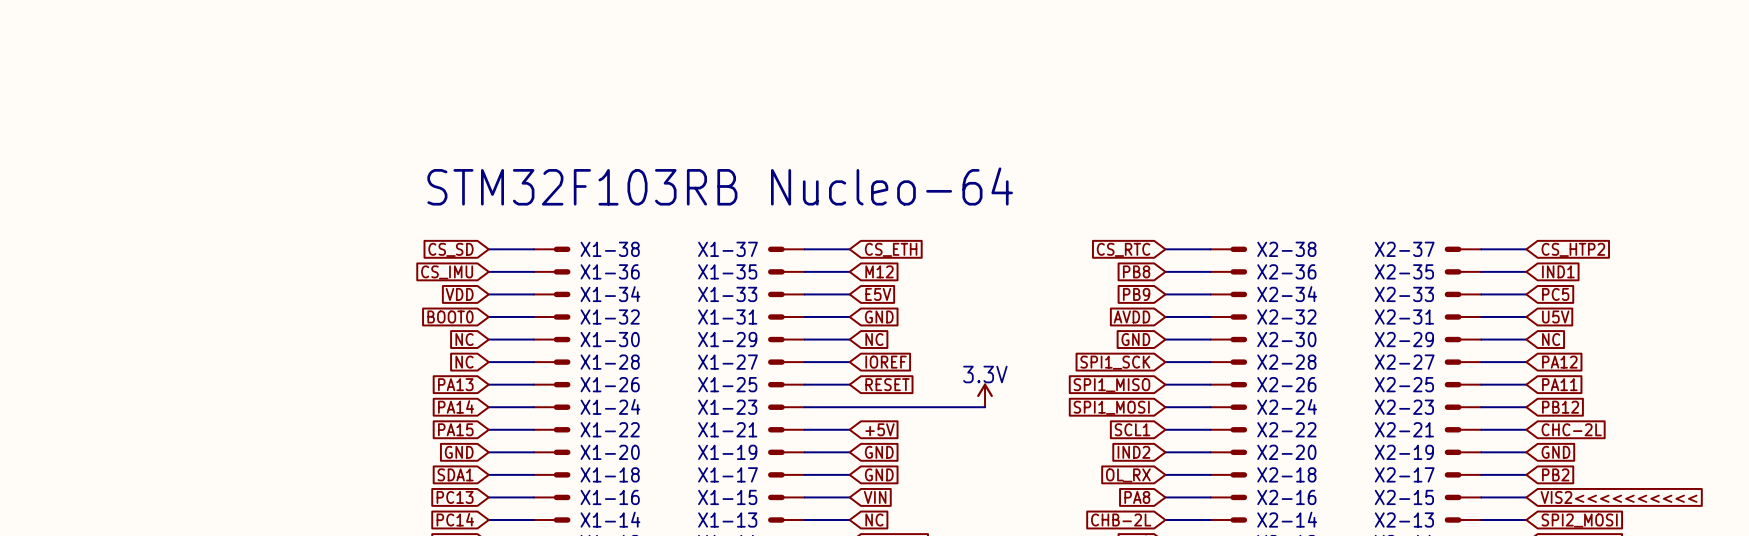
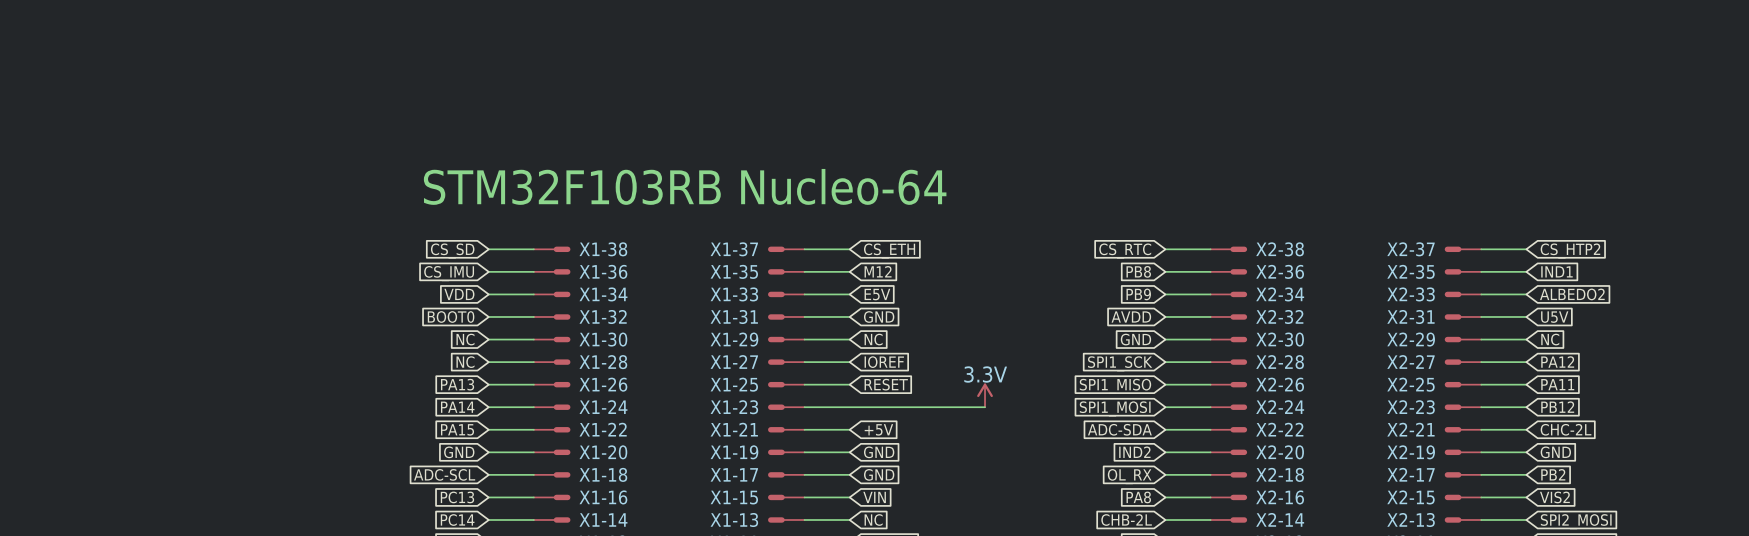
global label: PC5 (1555, 294) -> ALBEDO2 (1572, 294)
global label: SCL1 (1132, 429) -> ADC-SDA (1119, 429)
global label: SDA1 (455, 474) -> ADC-SCL (444, 474)
global label: VIS2<<<<<<<<<< (1619, 497) -> VIS2 (1554, 497)

